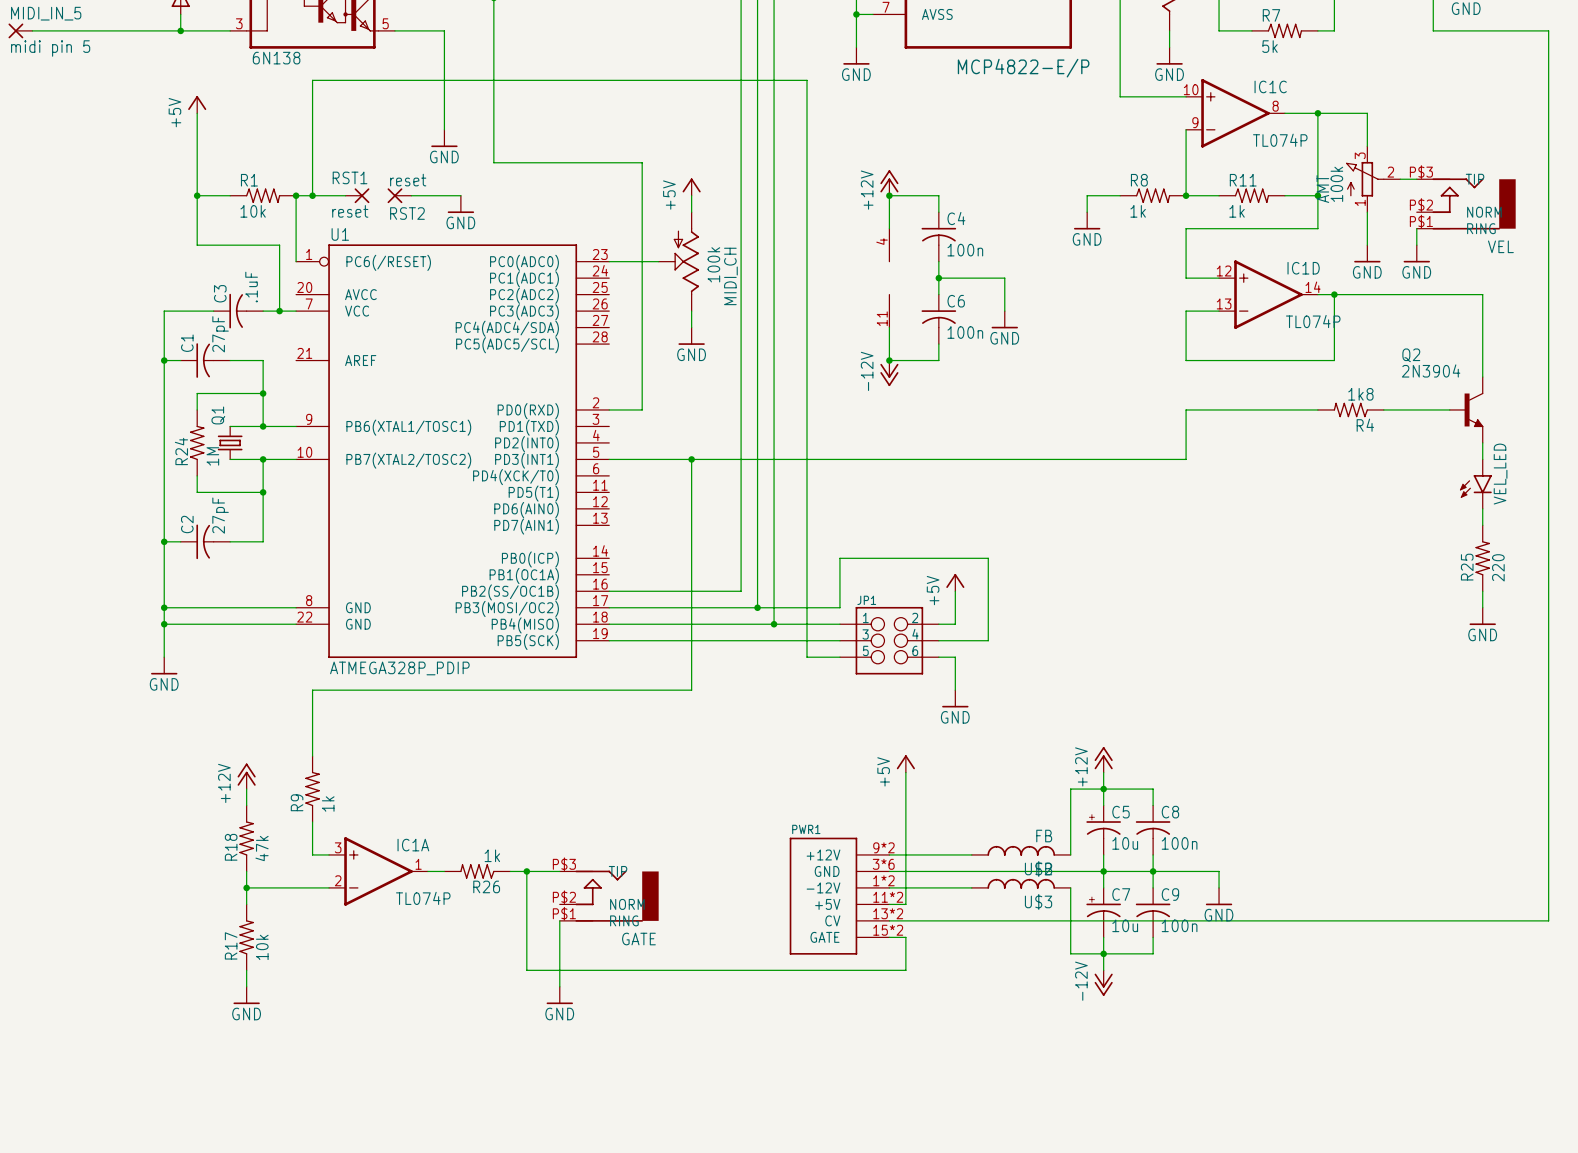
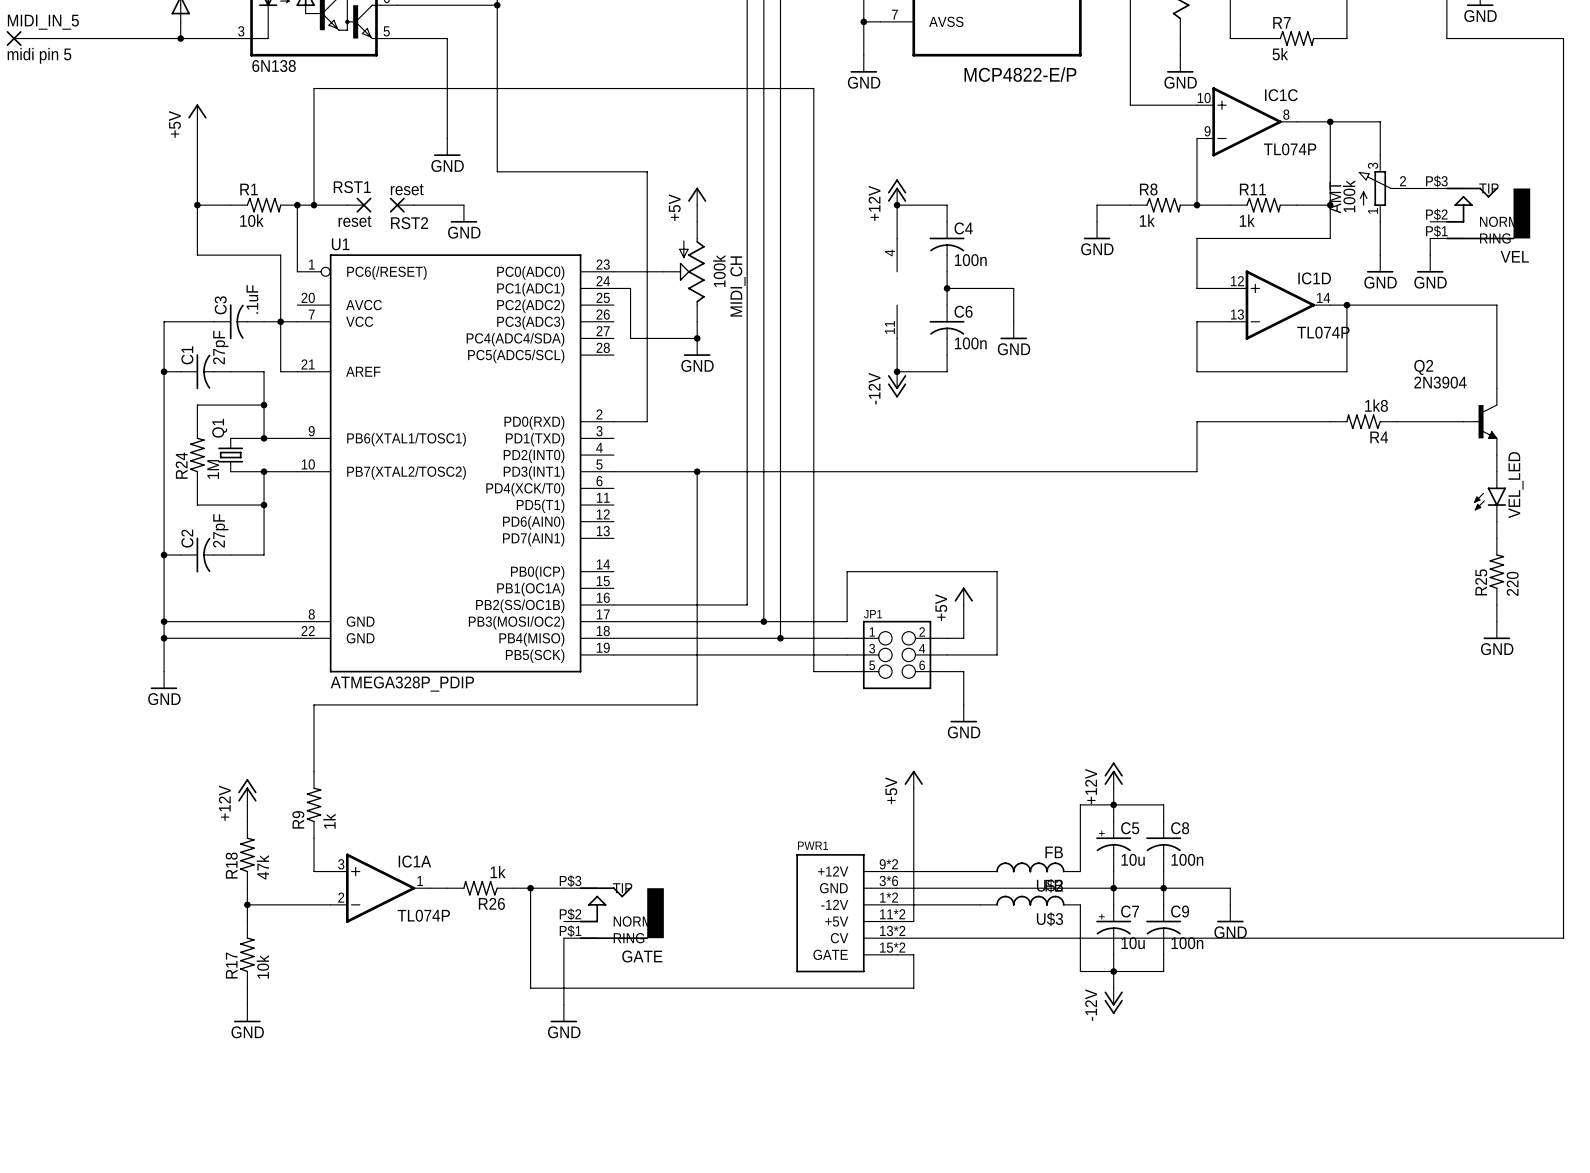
wire: none -> (613, 288) (630, 288) (630, 338) (697, 338)
wire: none -> (280, 321) (280, 371) (297, 371)
junction: none -> (697, 338)

